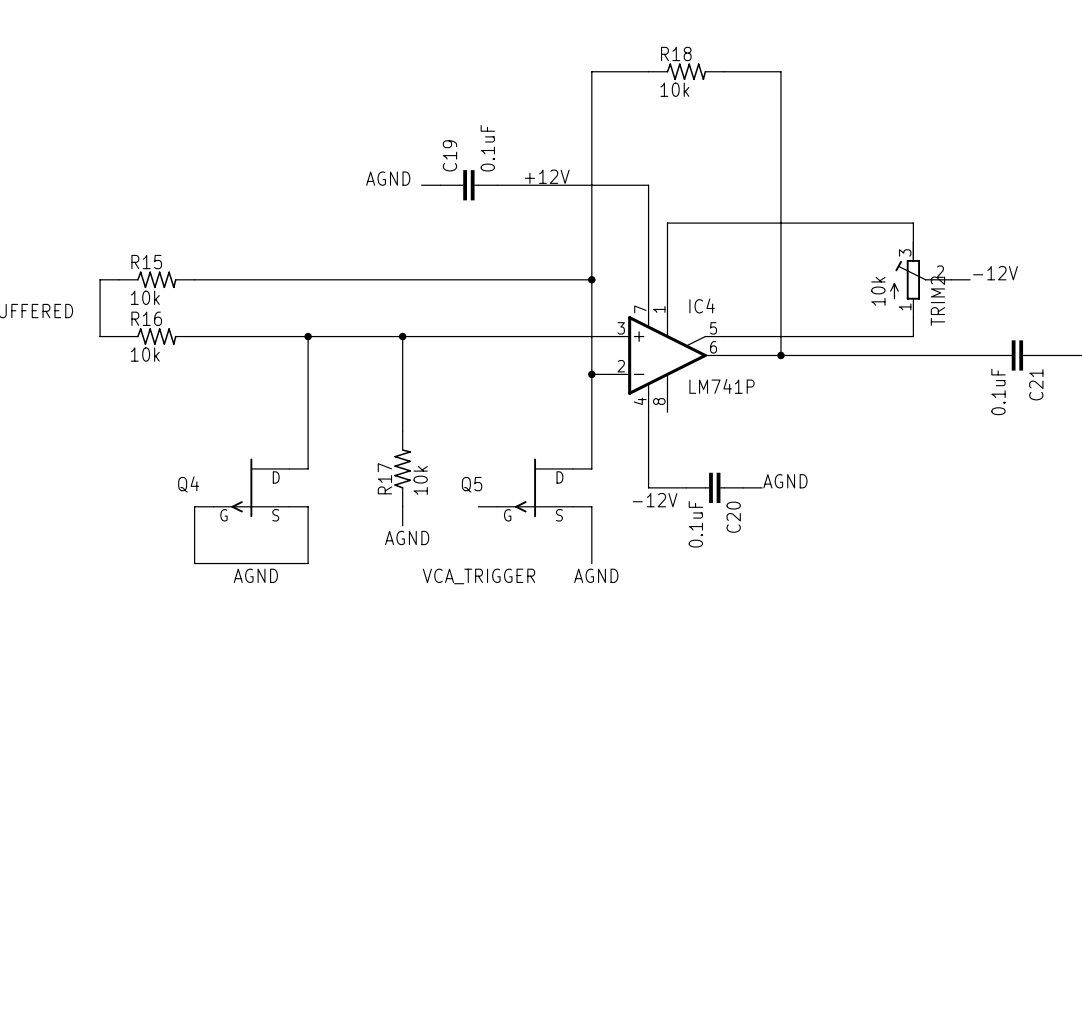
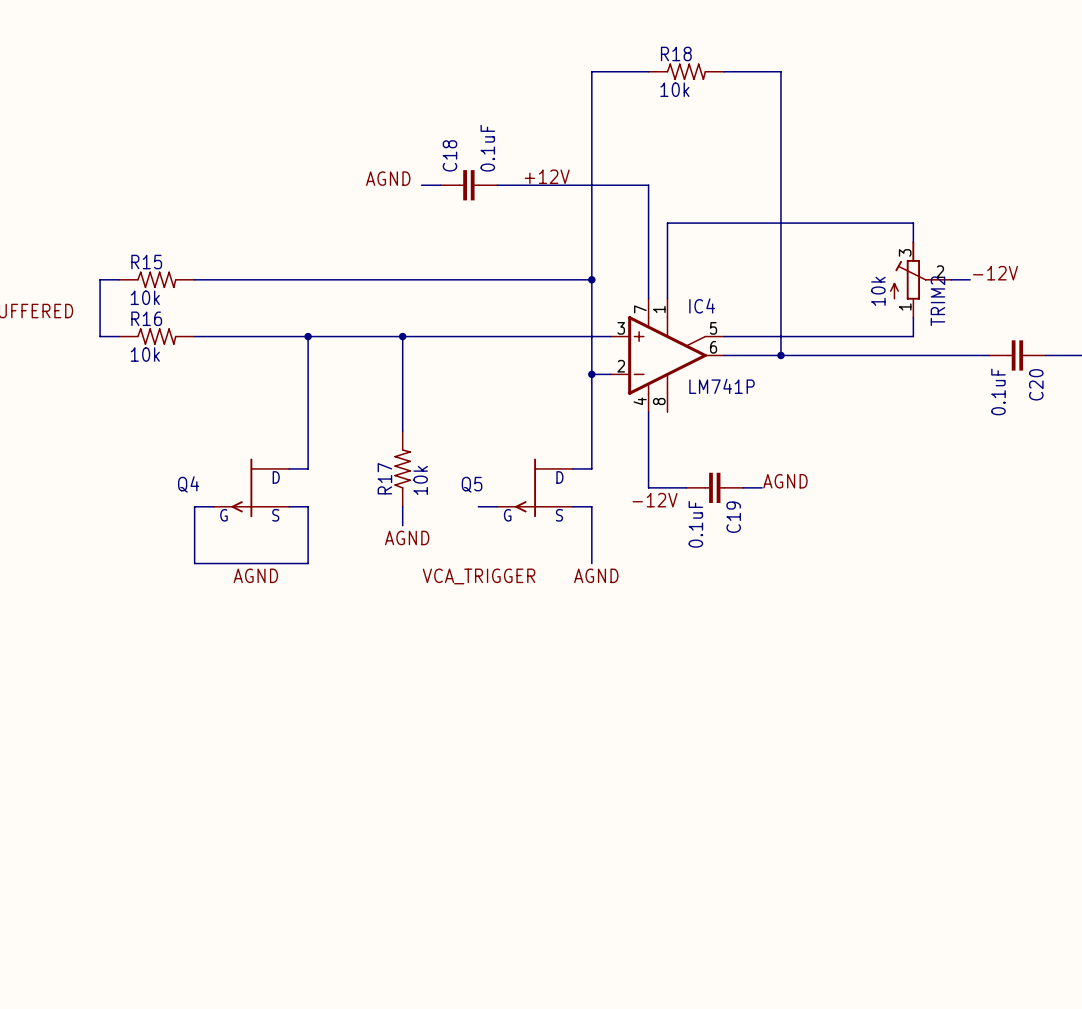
C19 name: C19 (449, 155) -> C18 (449, 155)
C21 name: C21 (1036, 384) -> C20 (1036, 384)
C20 name: C20 (733, 517) -> C19 (733, 517)

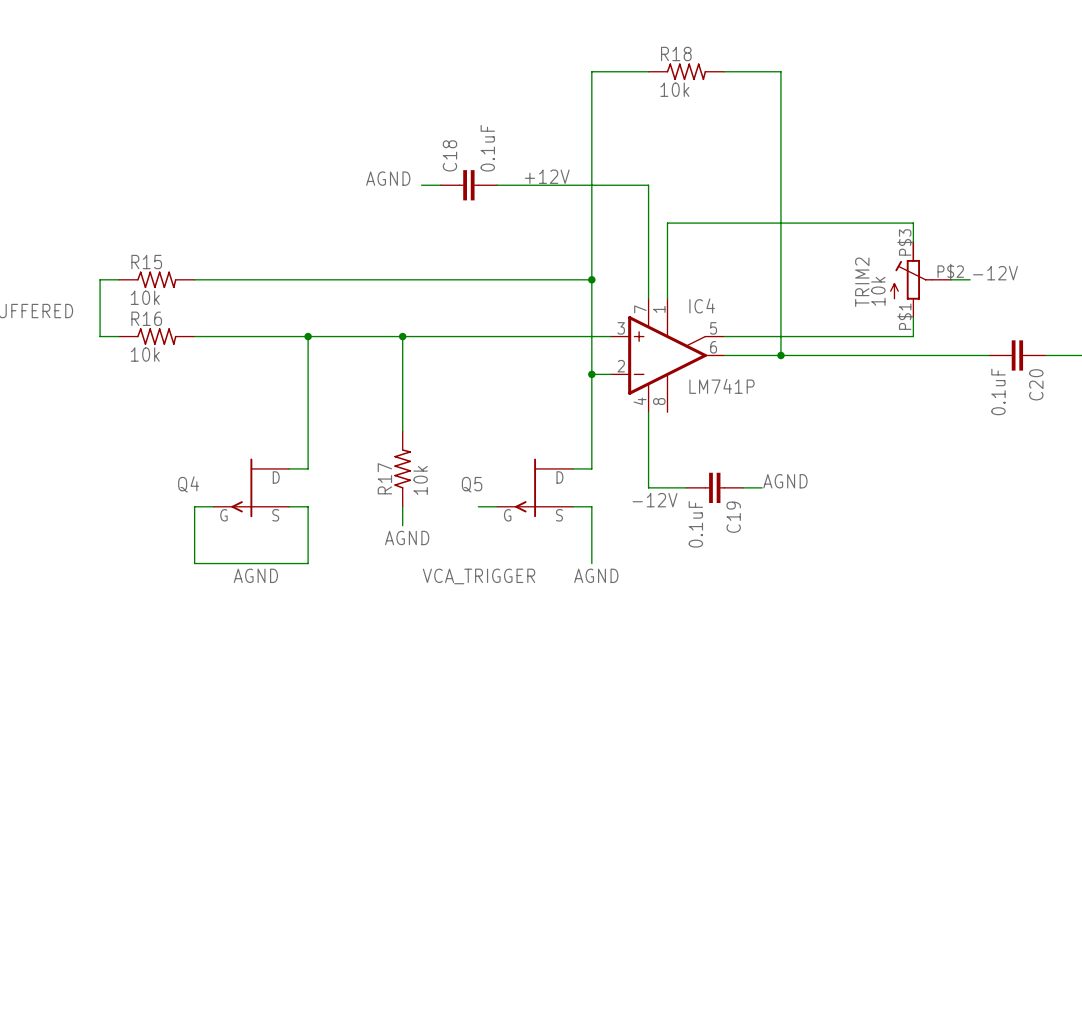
TRIM2 pin number: 3 (905, 252) -> P$3 (905, 242)
TRIM2 pin number: 2 (940, 271) -> P$2 (950, 271)
TRIM2 name position: TRIM2 (937, 301) -> TRIM2 (862, 282)
TRIM2 pin number: 1 (905, 306) -> P$1 (905, 316)

